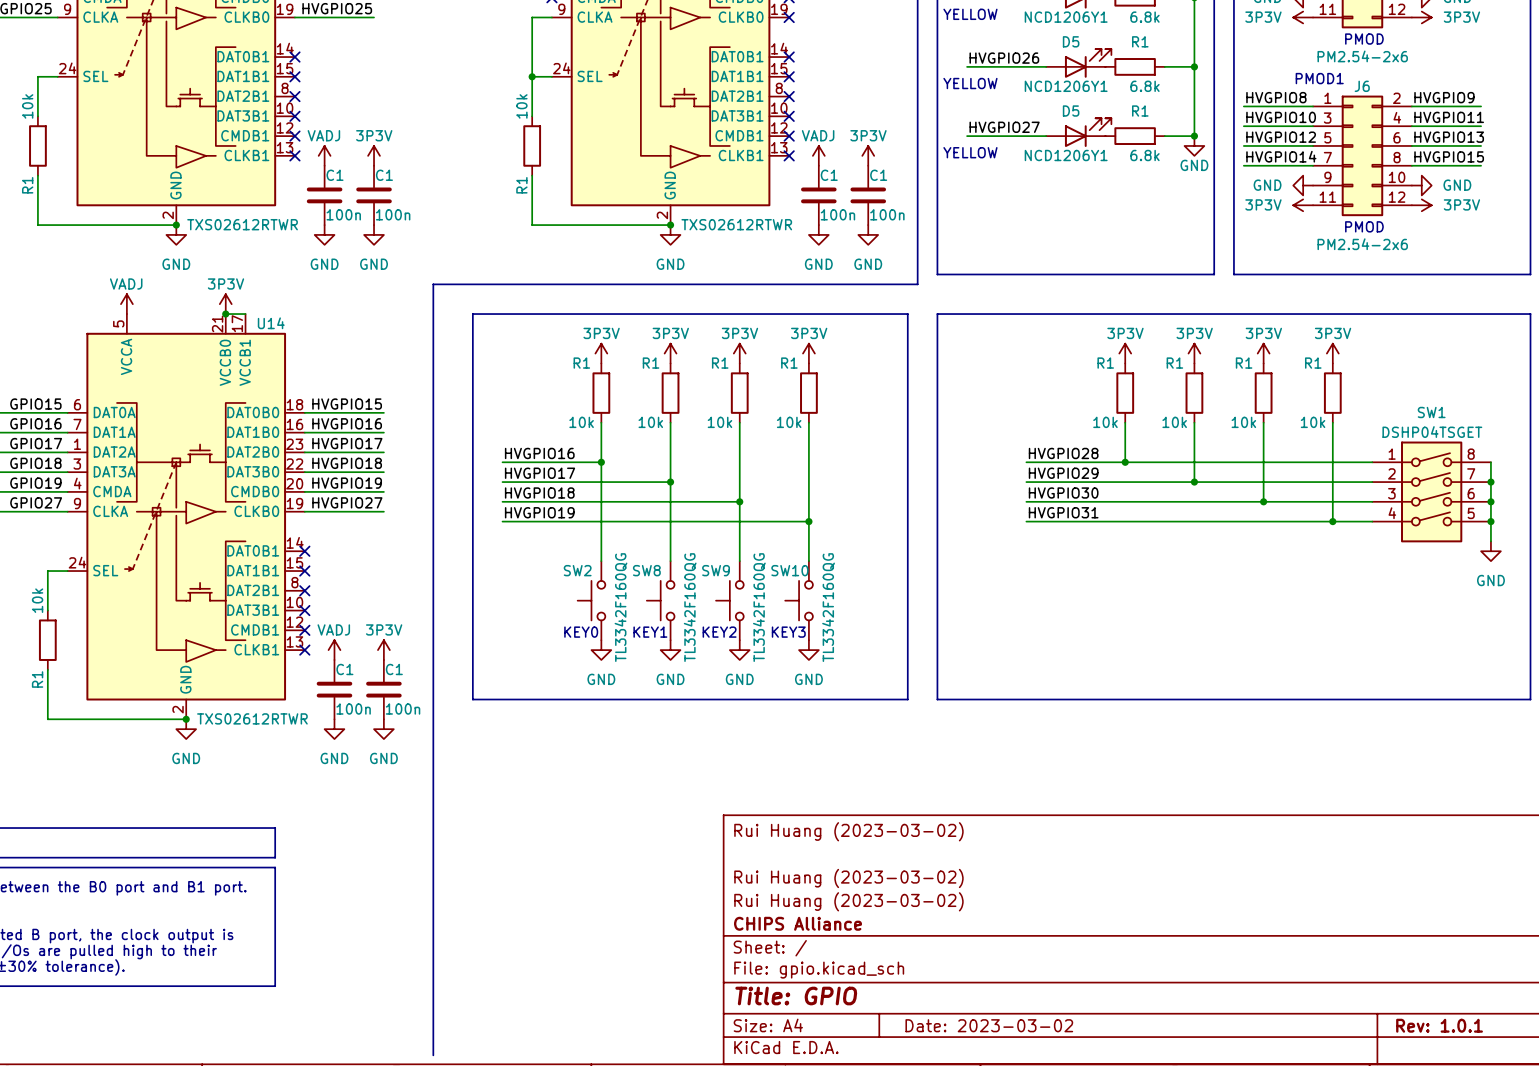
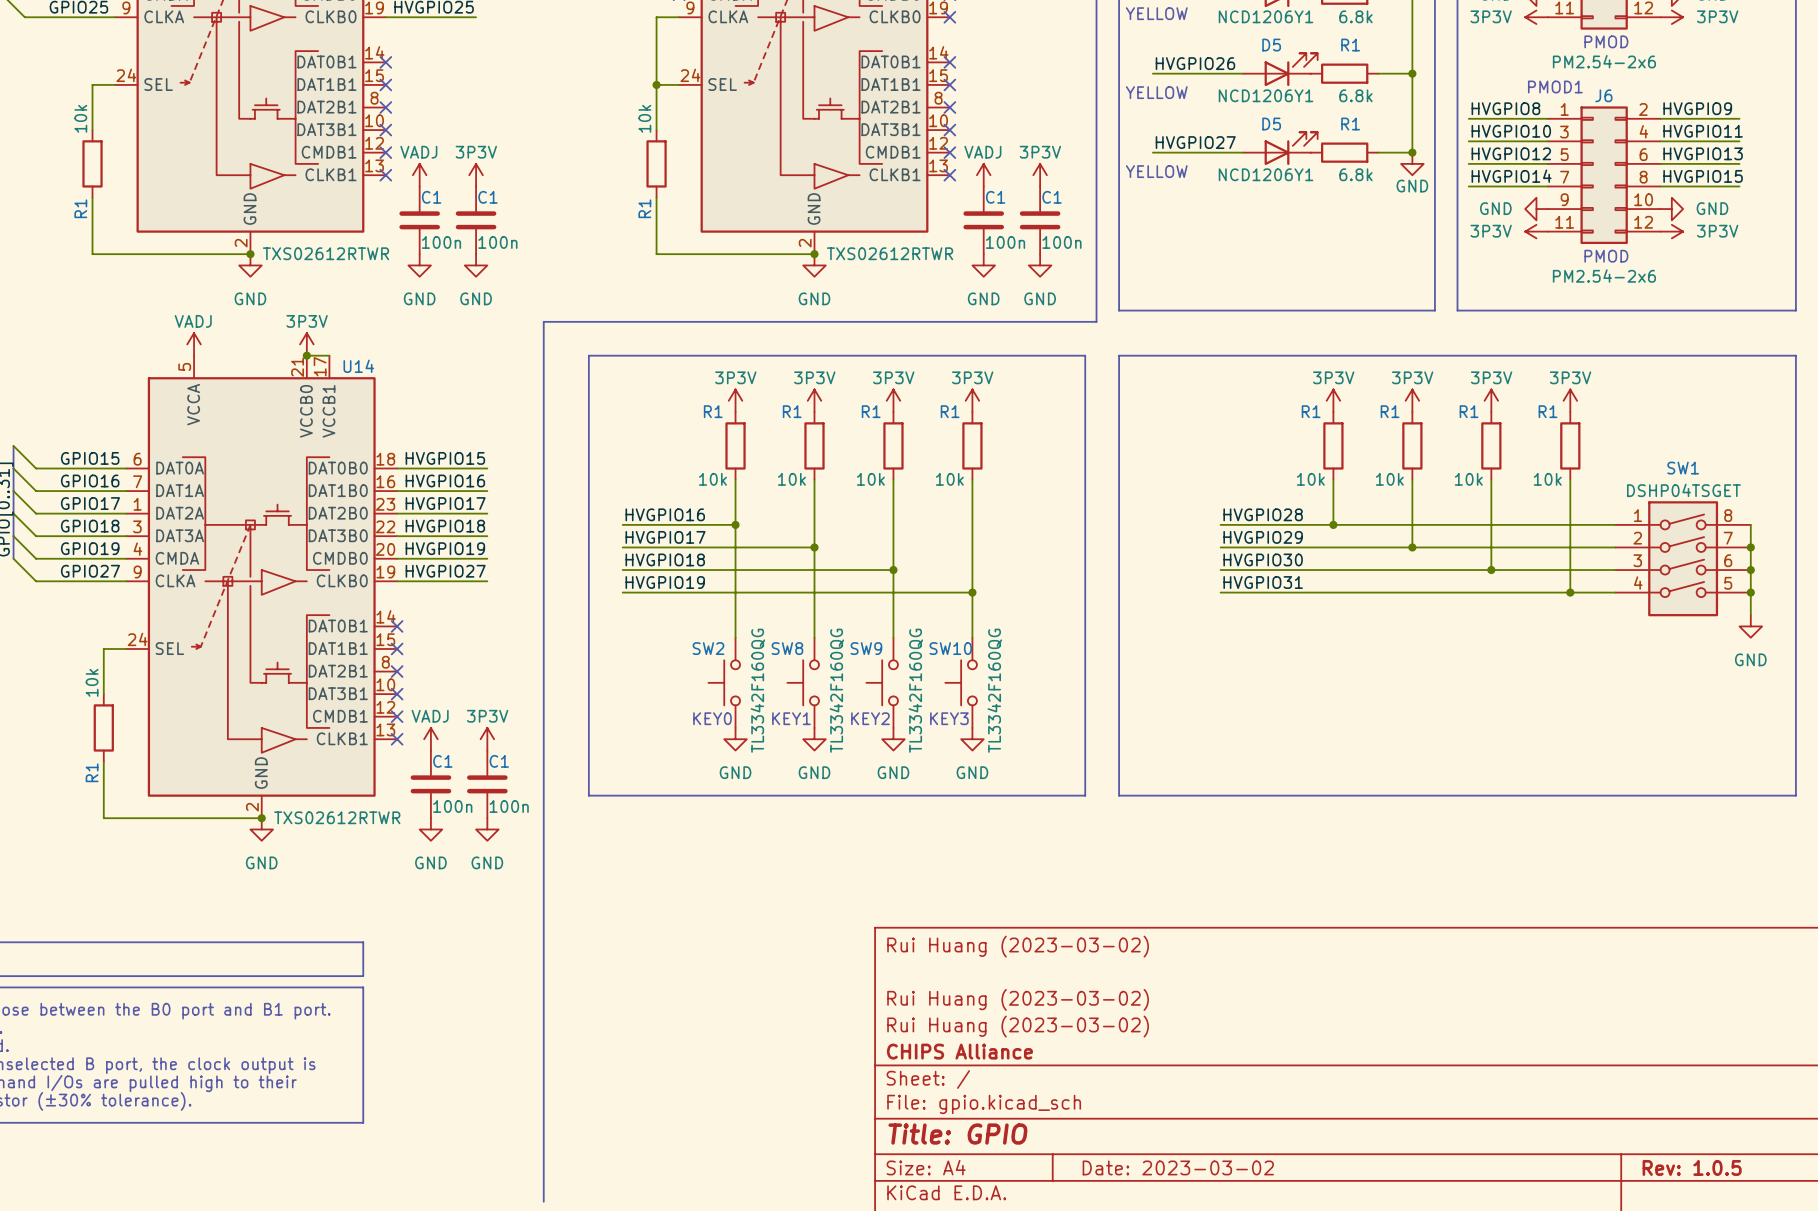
title block: Rev: 1.0.1 (1439, 1025) -> Rev: 1.0.5 (1692, 1167)

